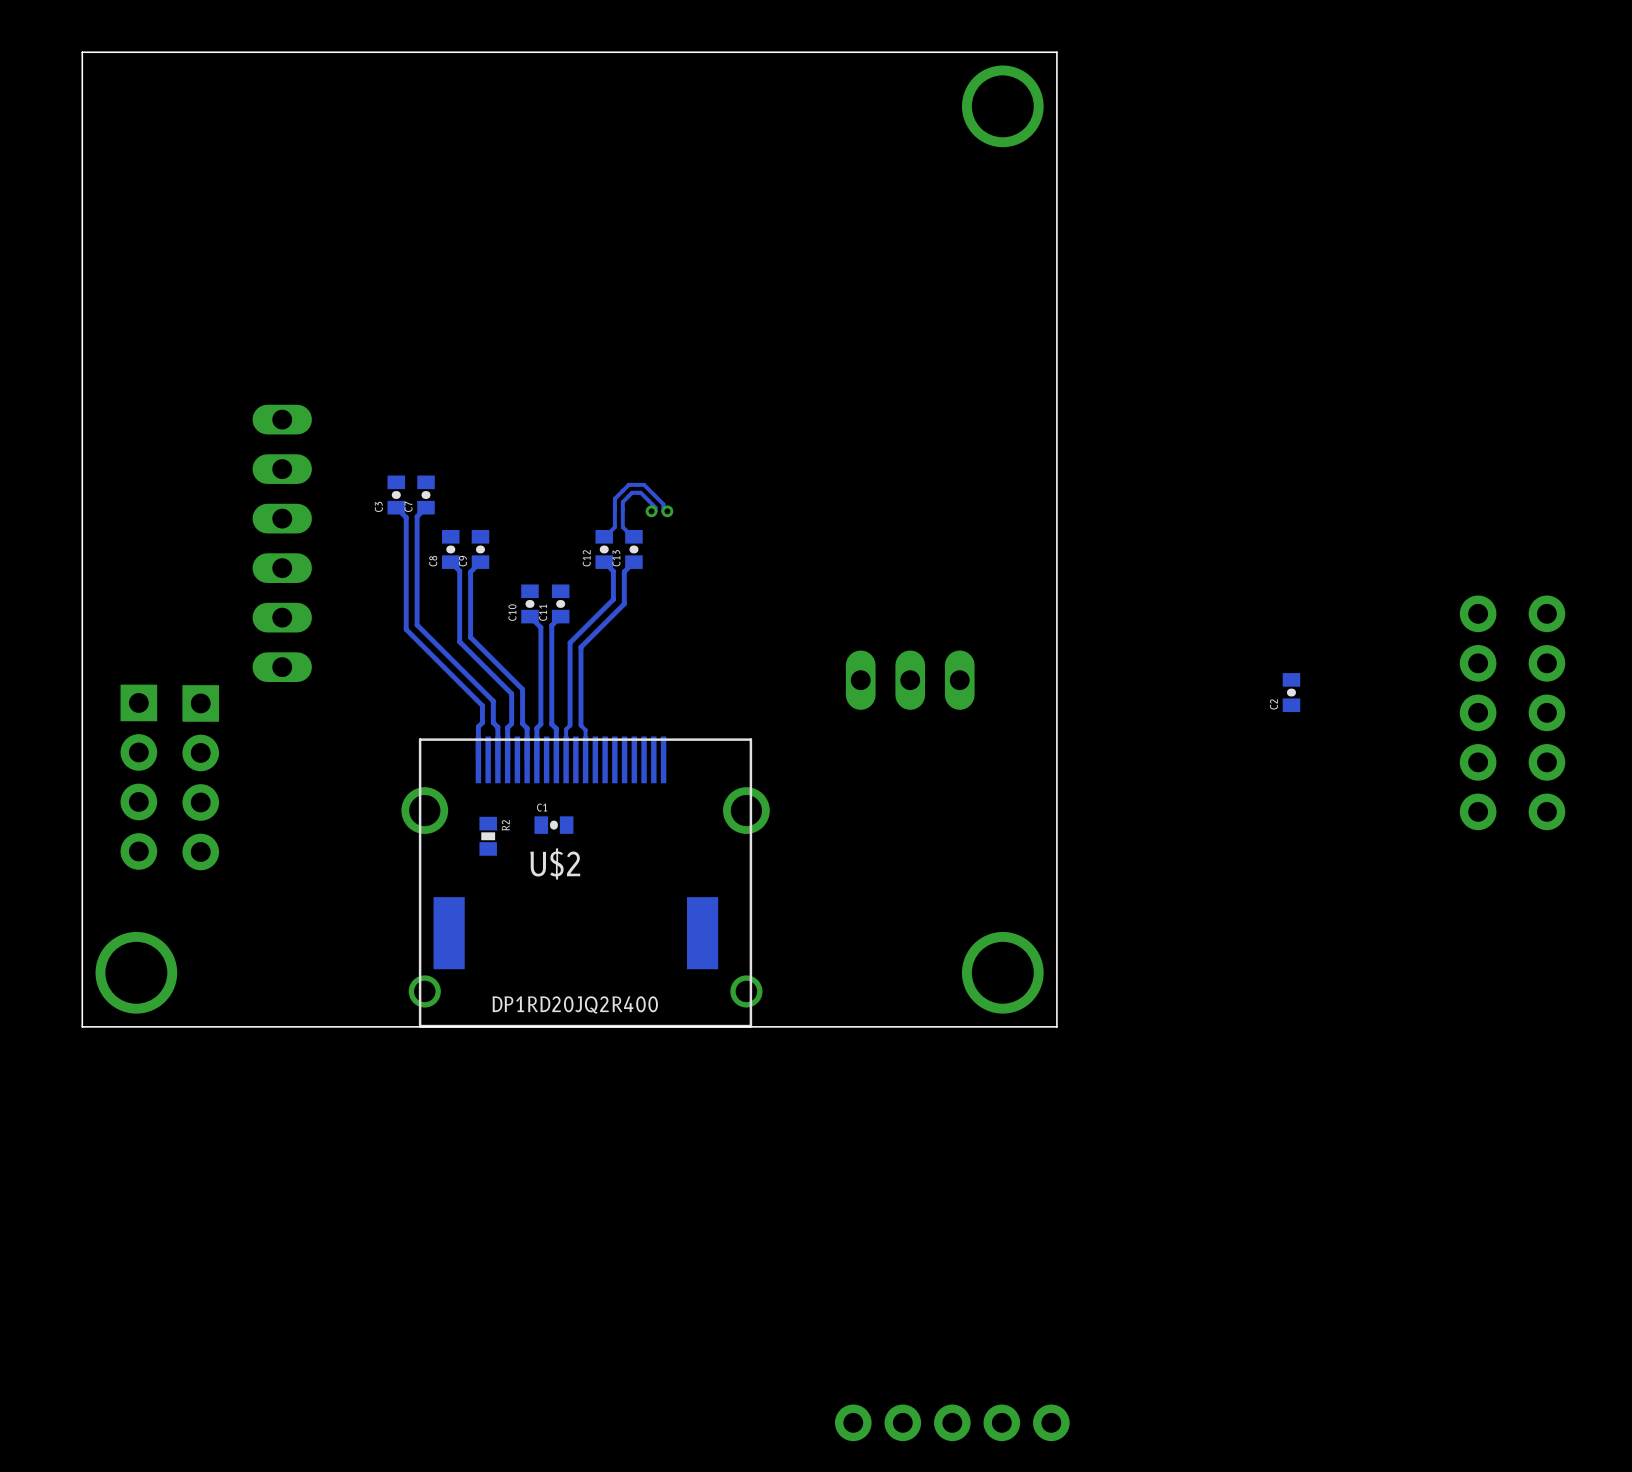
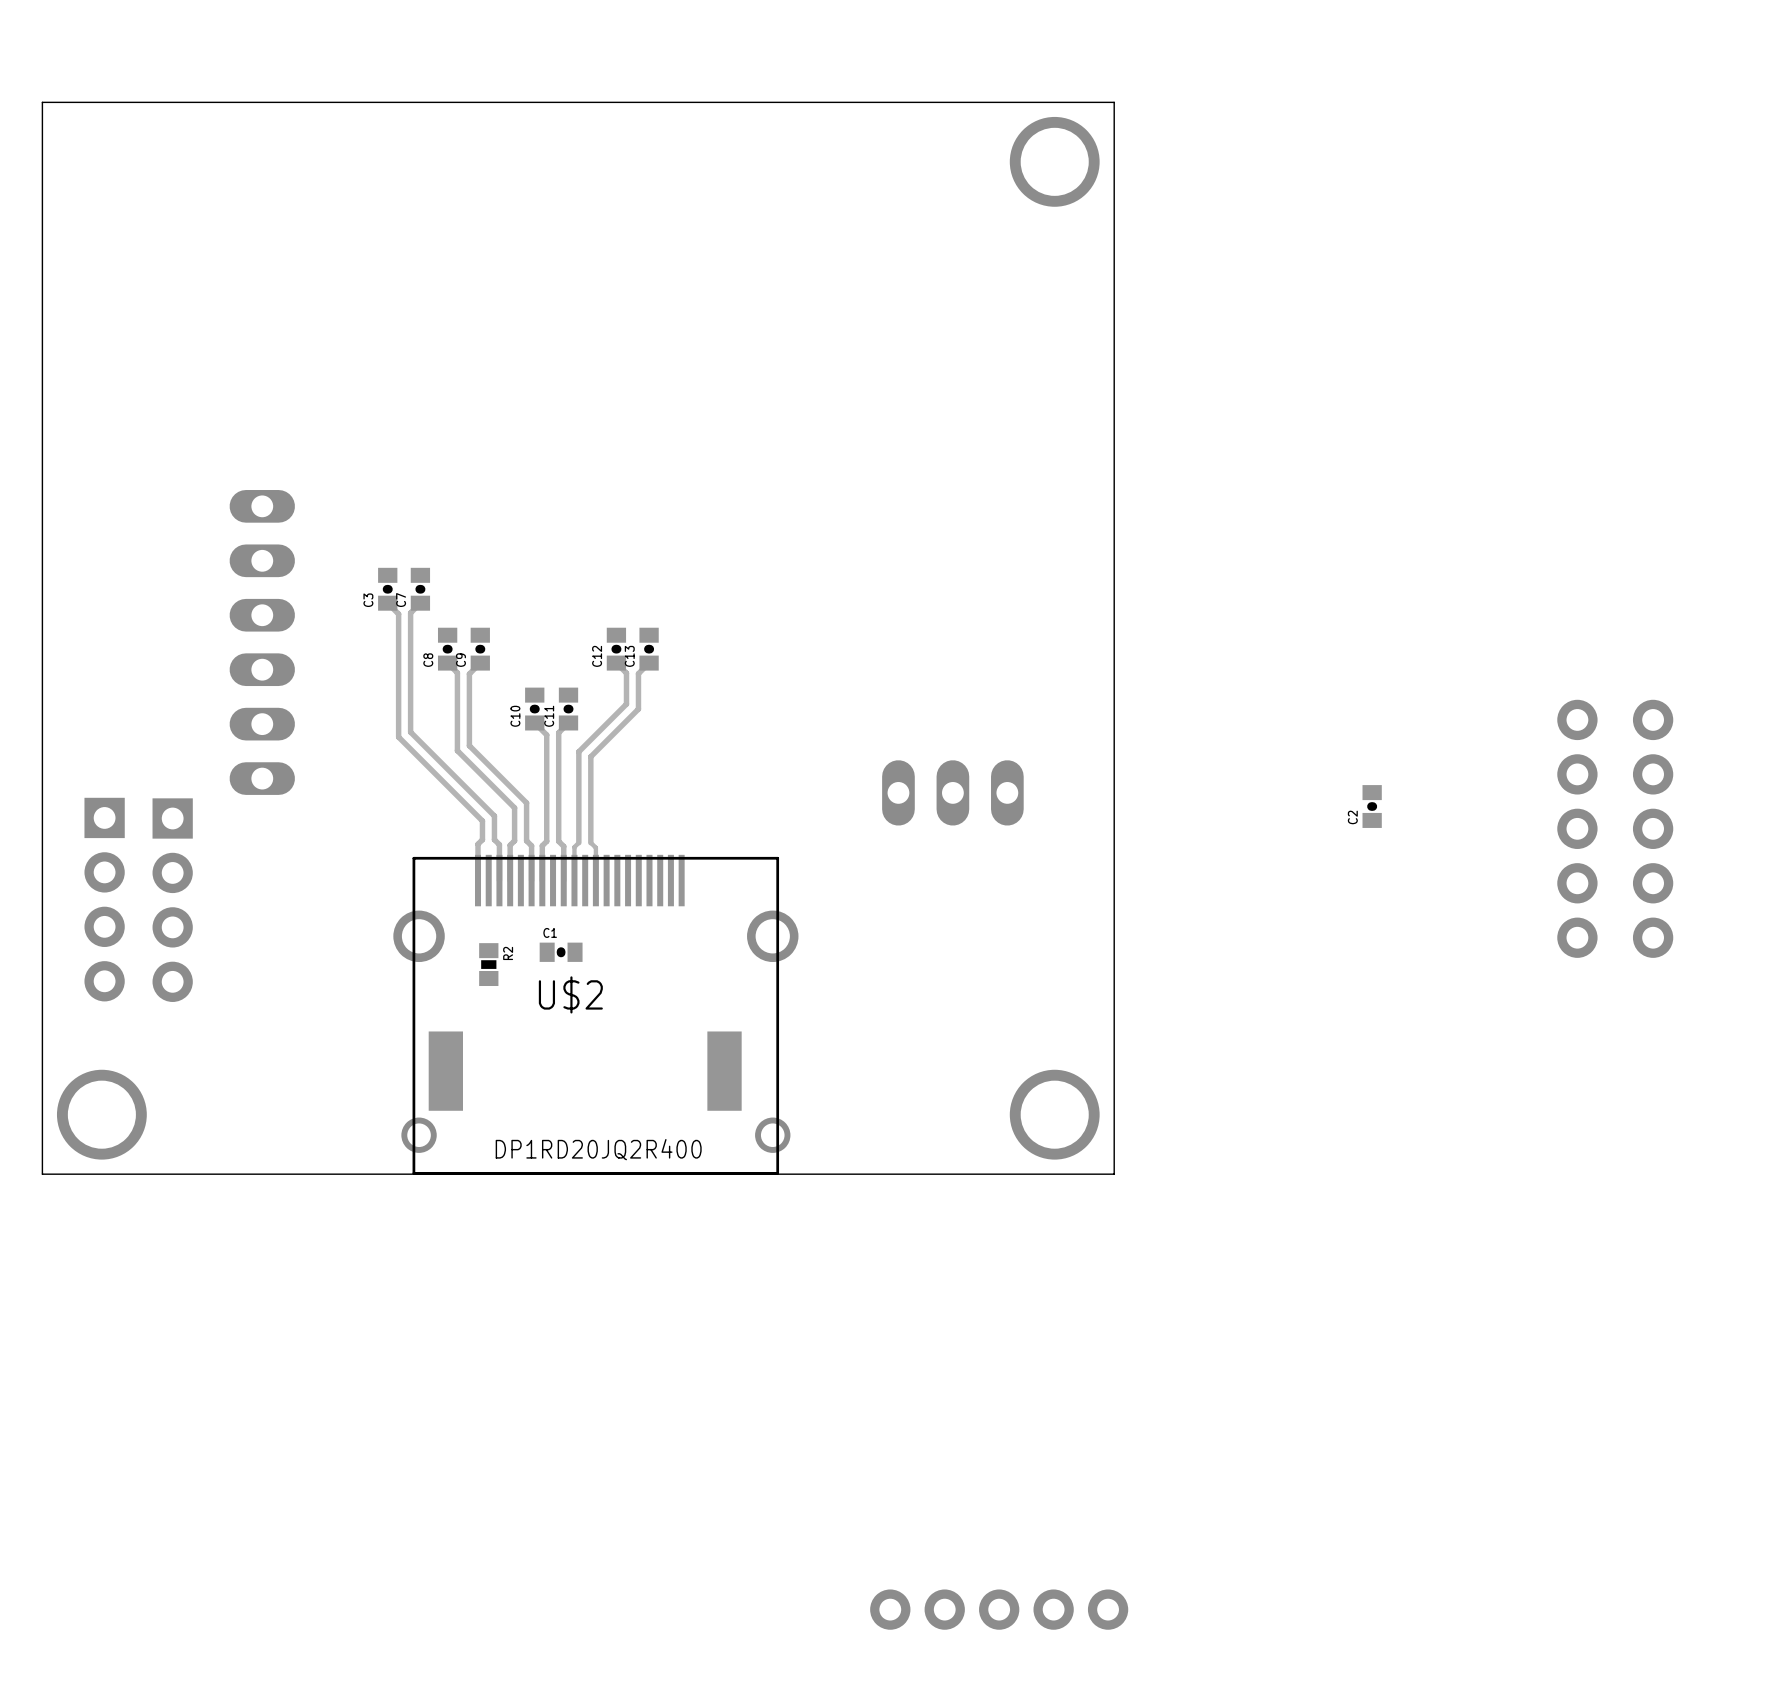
track: (651, 511) (655, 511) (655, 507) (640, 492) (632, 492) (622, 502) (622, 527) (633, 536) -> none
via: (651, 511) -> none
track: (667, 511) (663, 511) (663, 504) (644, 484) (628, 484) (614, 498) (614, 527) (604, 536) -> none
via: (667, 511) -> none

